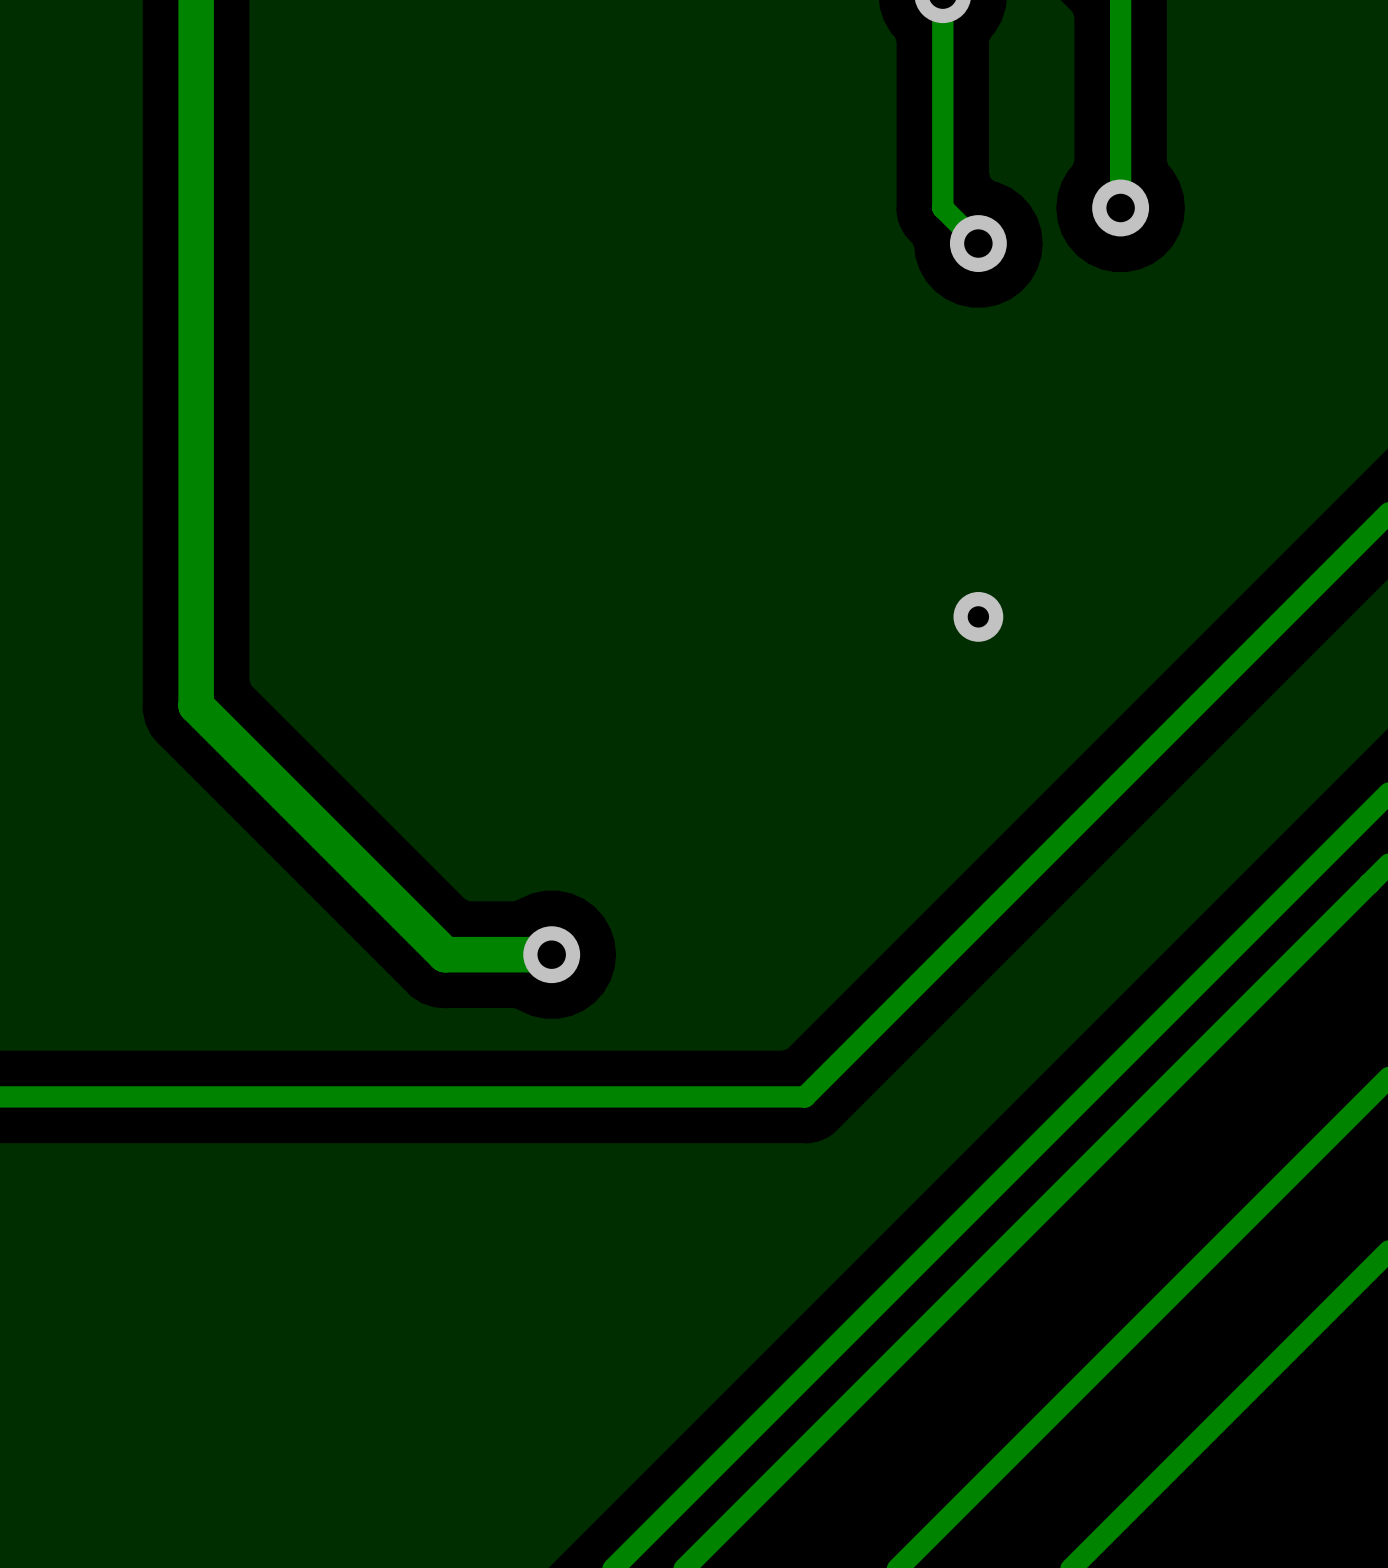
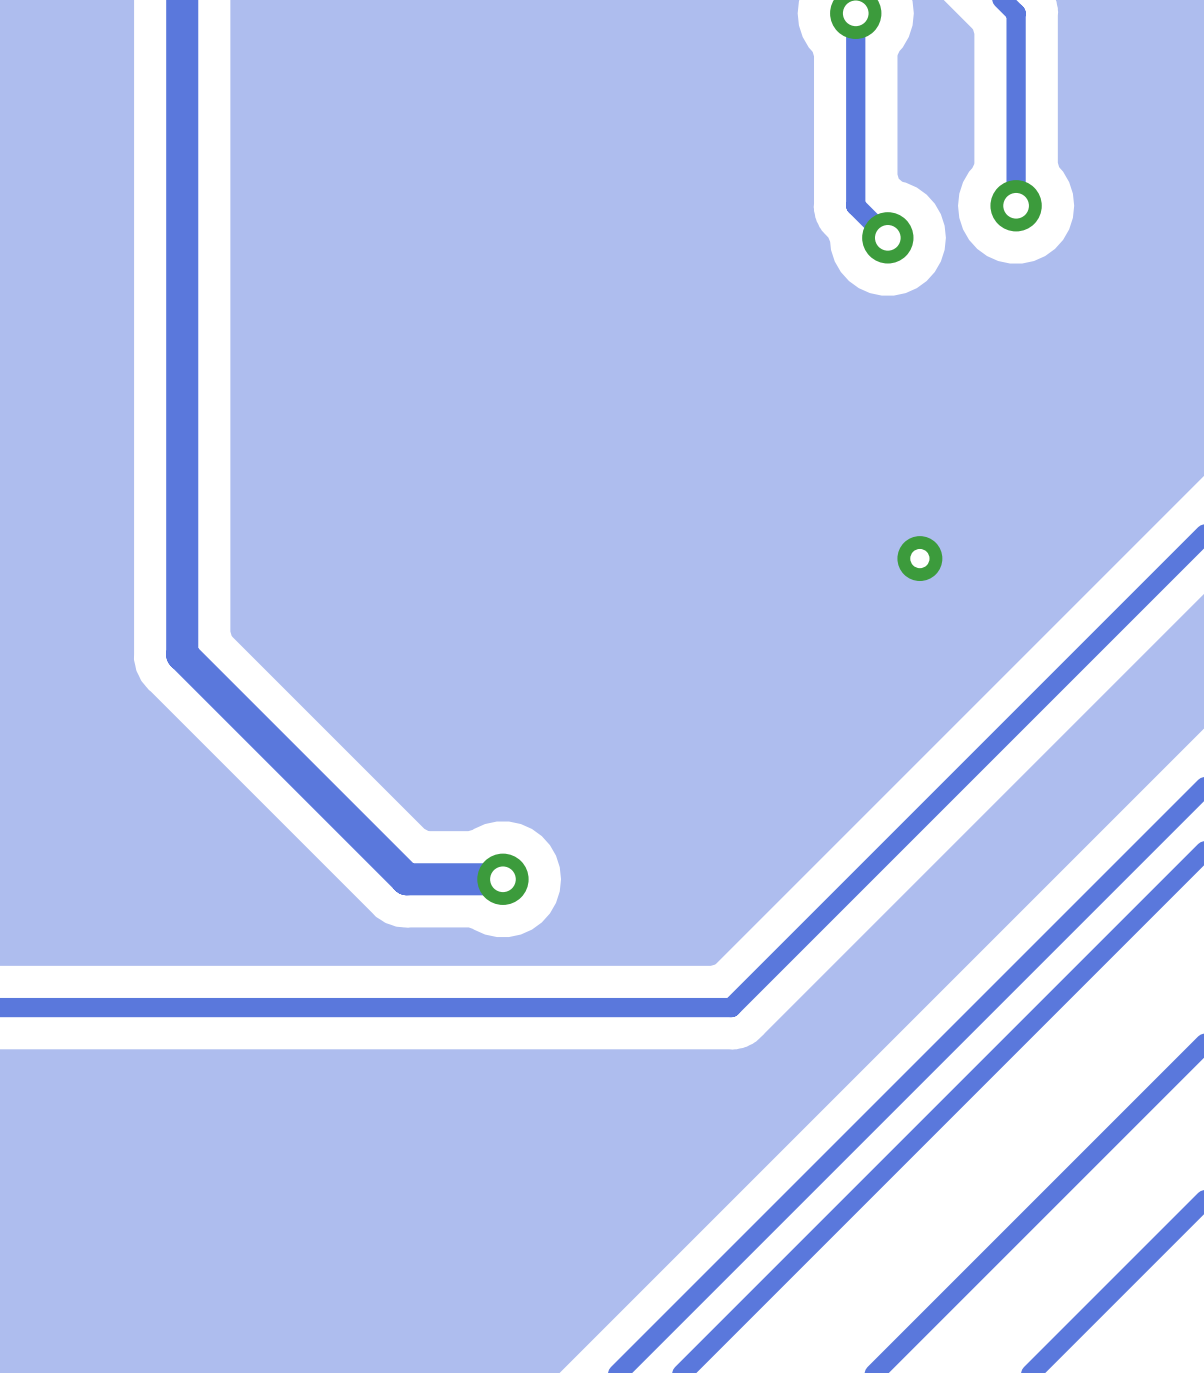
via position: (978, 616) -> (919, 558)

